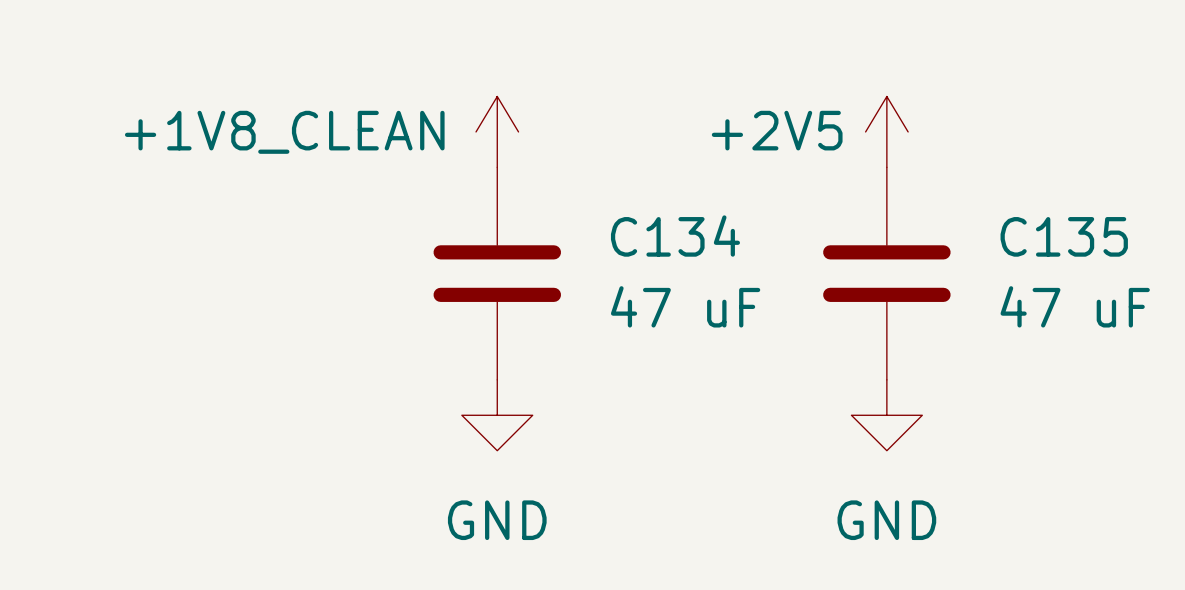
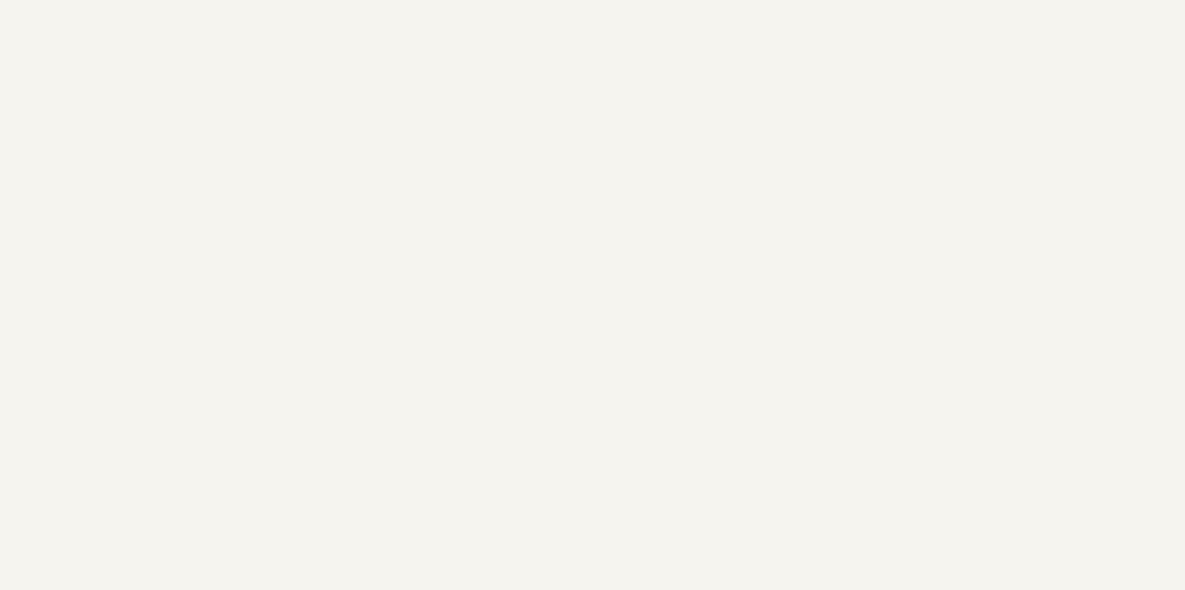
power symbol: +1V8_CLEAN (497, 131) -> none
power symbol: +2V5 (886, 131) -> none
C134: 47 uF (497, 273) -> none
C135: 47 uF (886, 273) -> none
power symbol: GND (497, 415) -> none
power symbol: GND (886, 415) -> none

